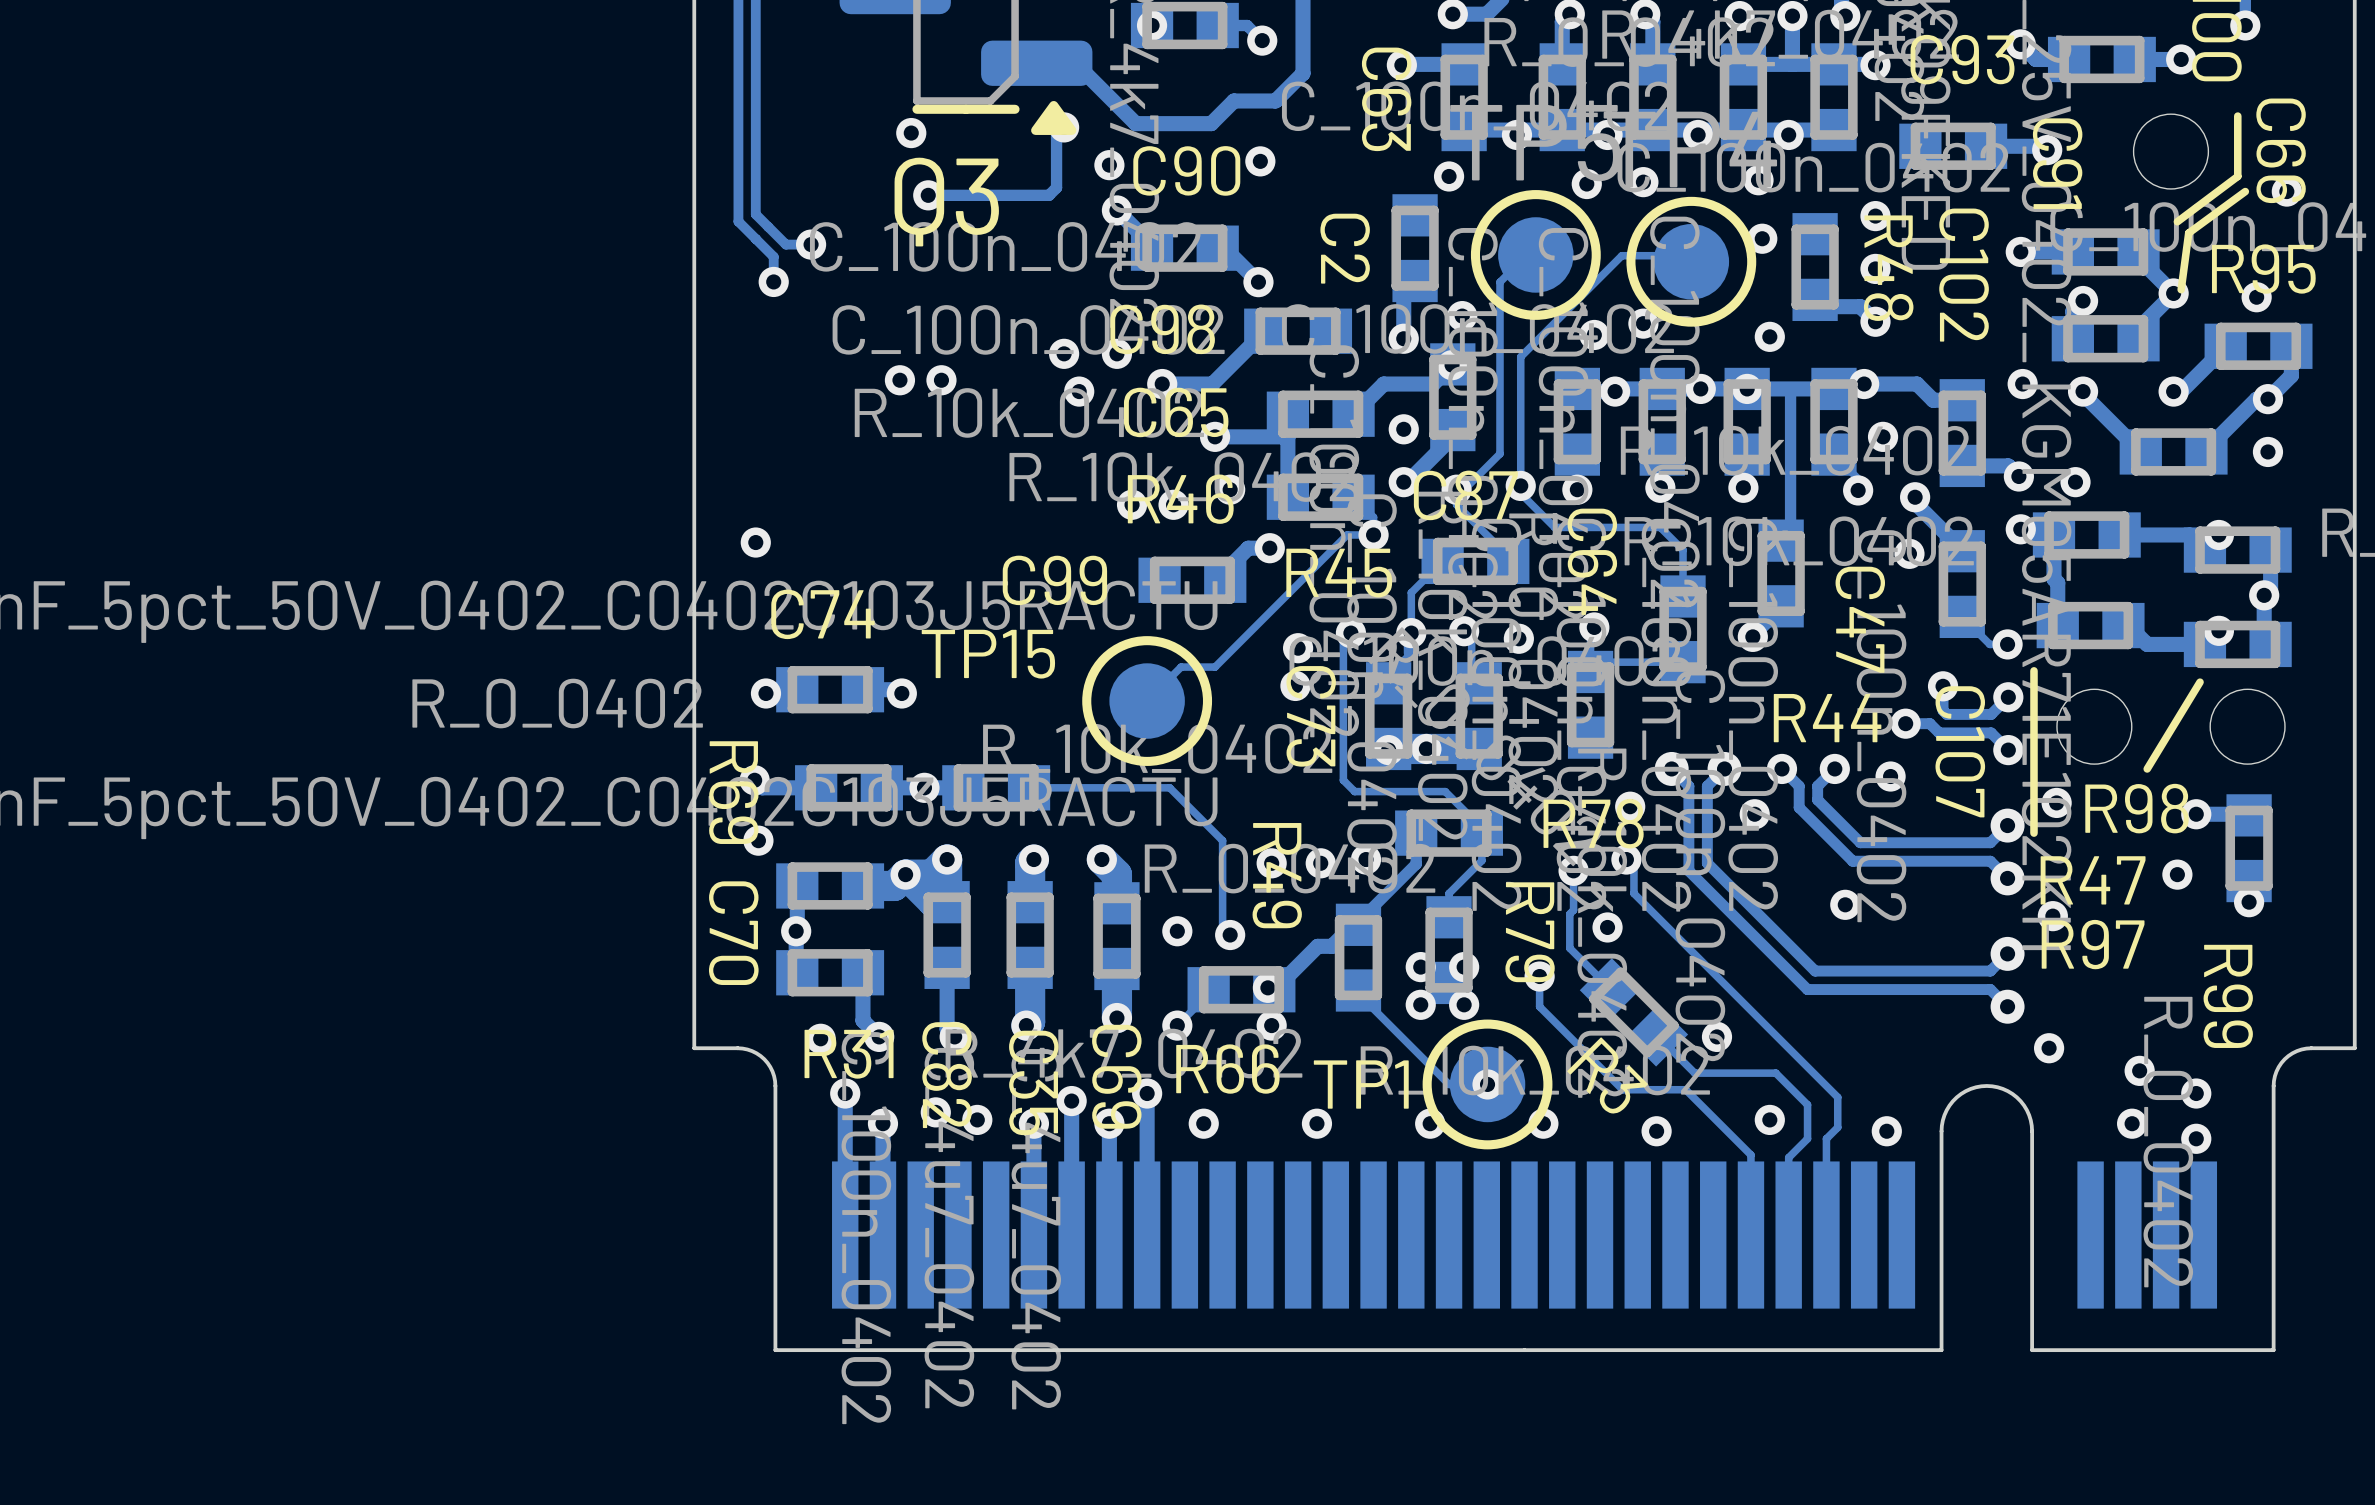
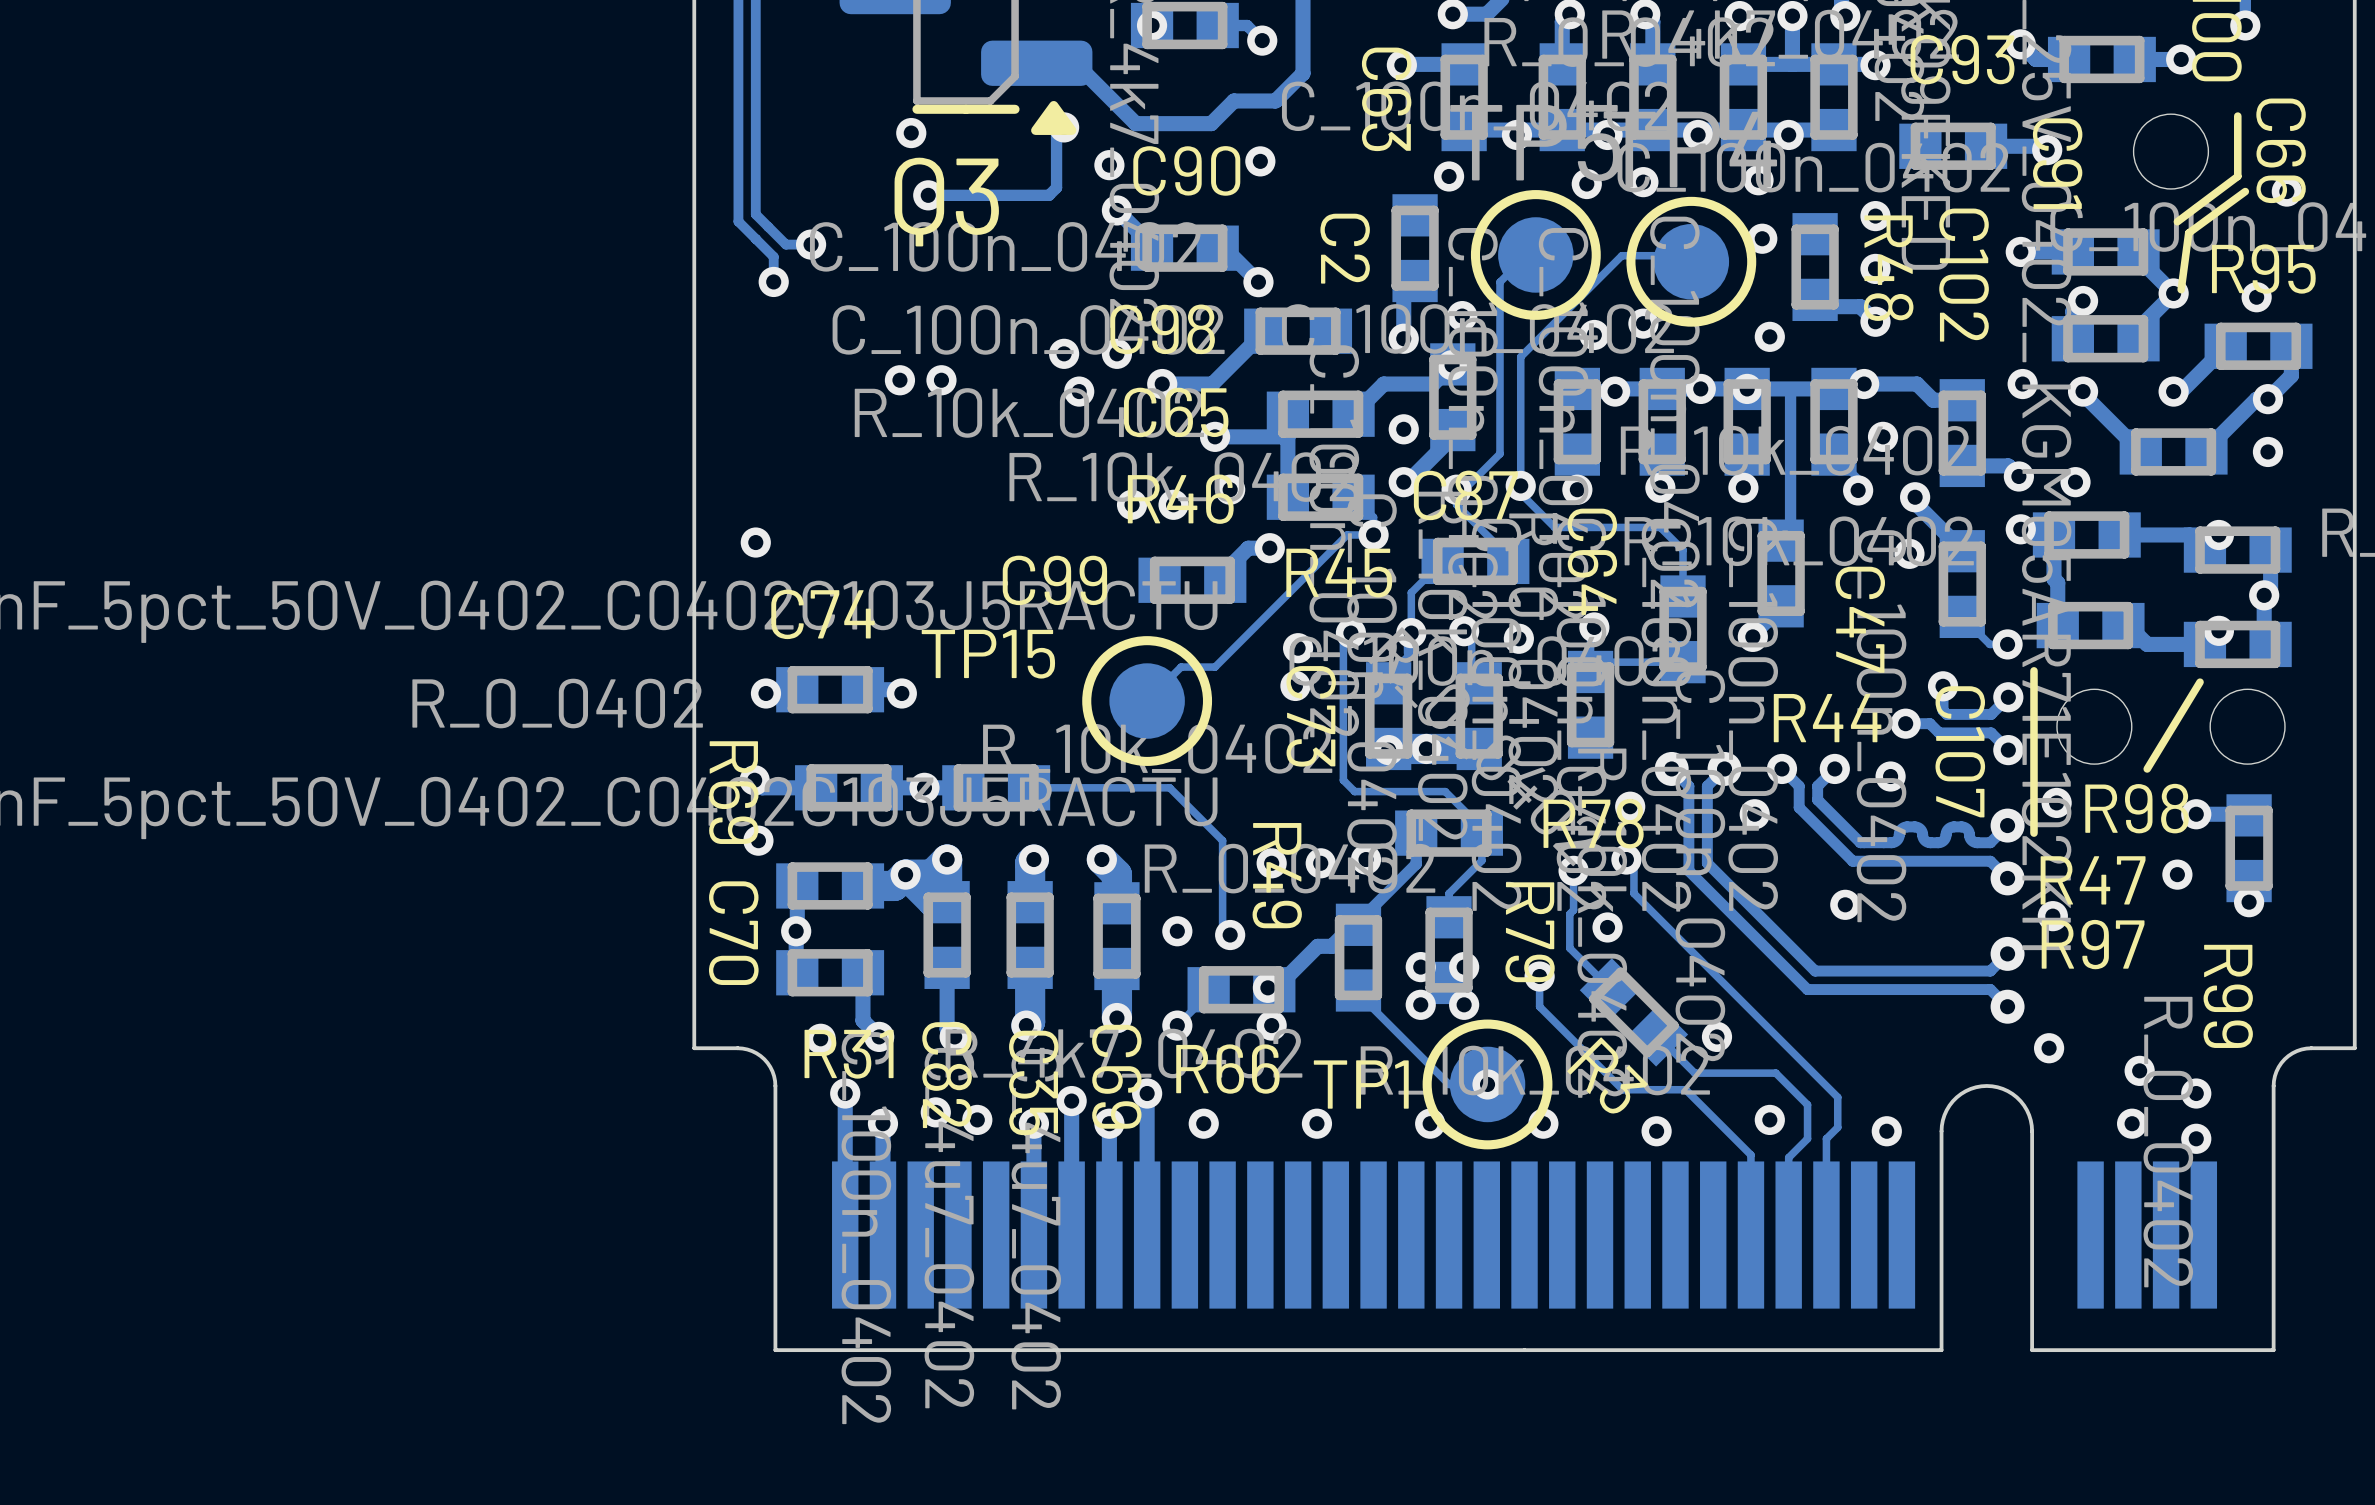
track: (1930, 842) (1891, 842) -> (1930, 842) (1924, 839) (1920, 829) (1914, 826) (1902, 828) (1897, 839) (1891, 842)
track: (1977, 842) (1938, 842) -> (1977, 842) (1971, 840) (1967, 829) (1961, 826) (1949, 828) (1944, 839) (1938, 842)

